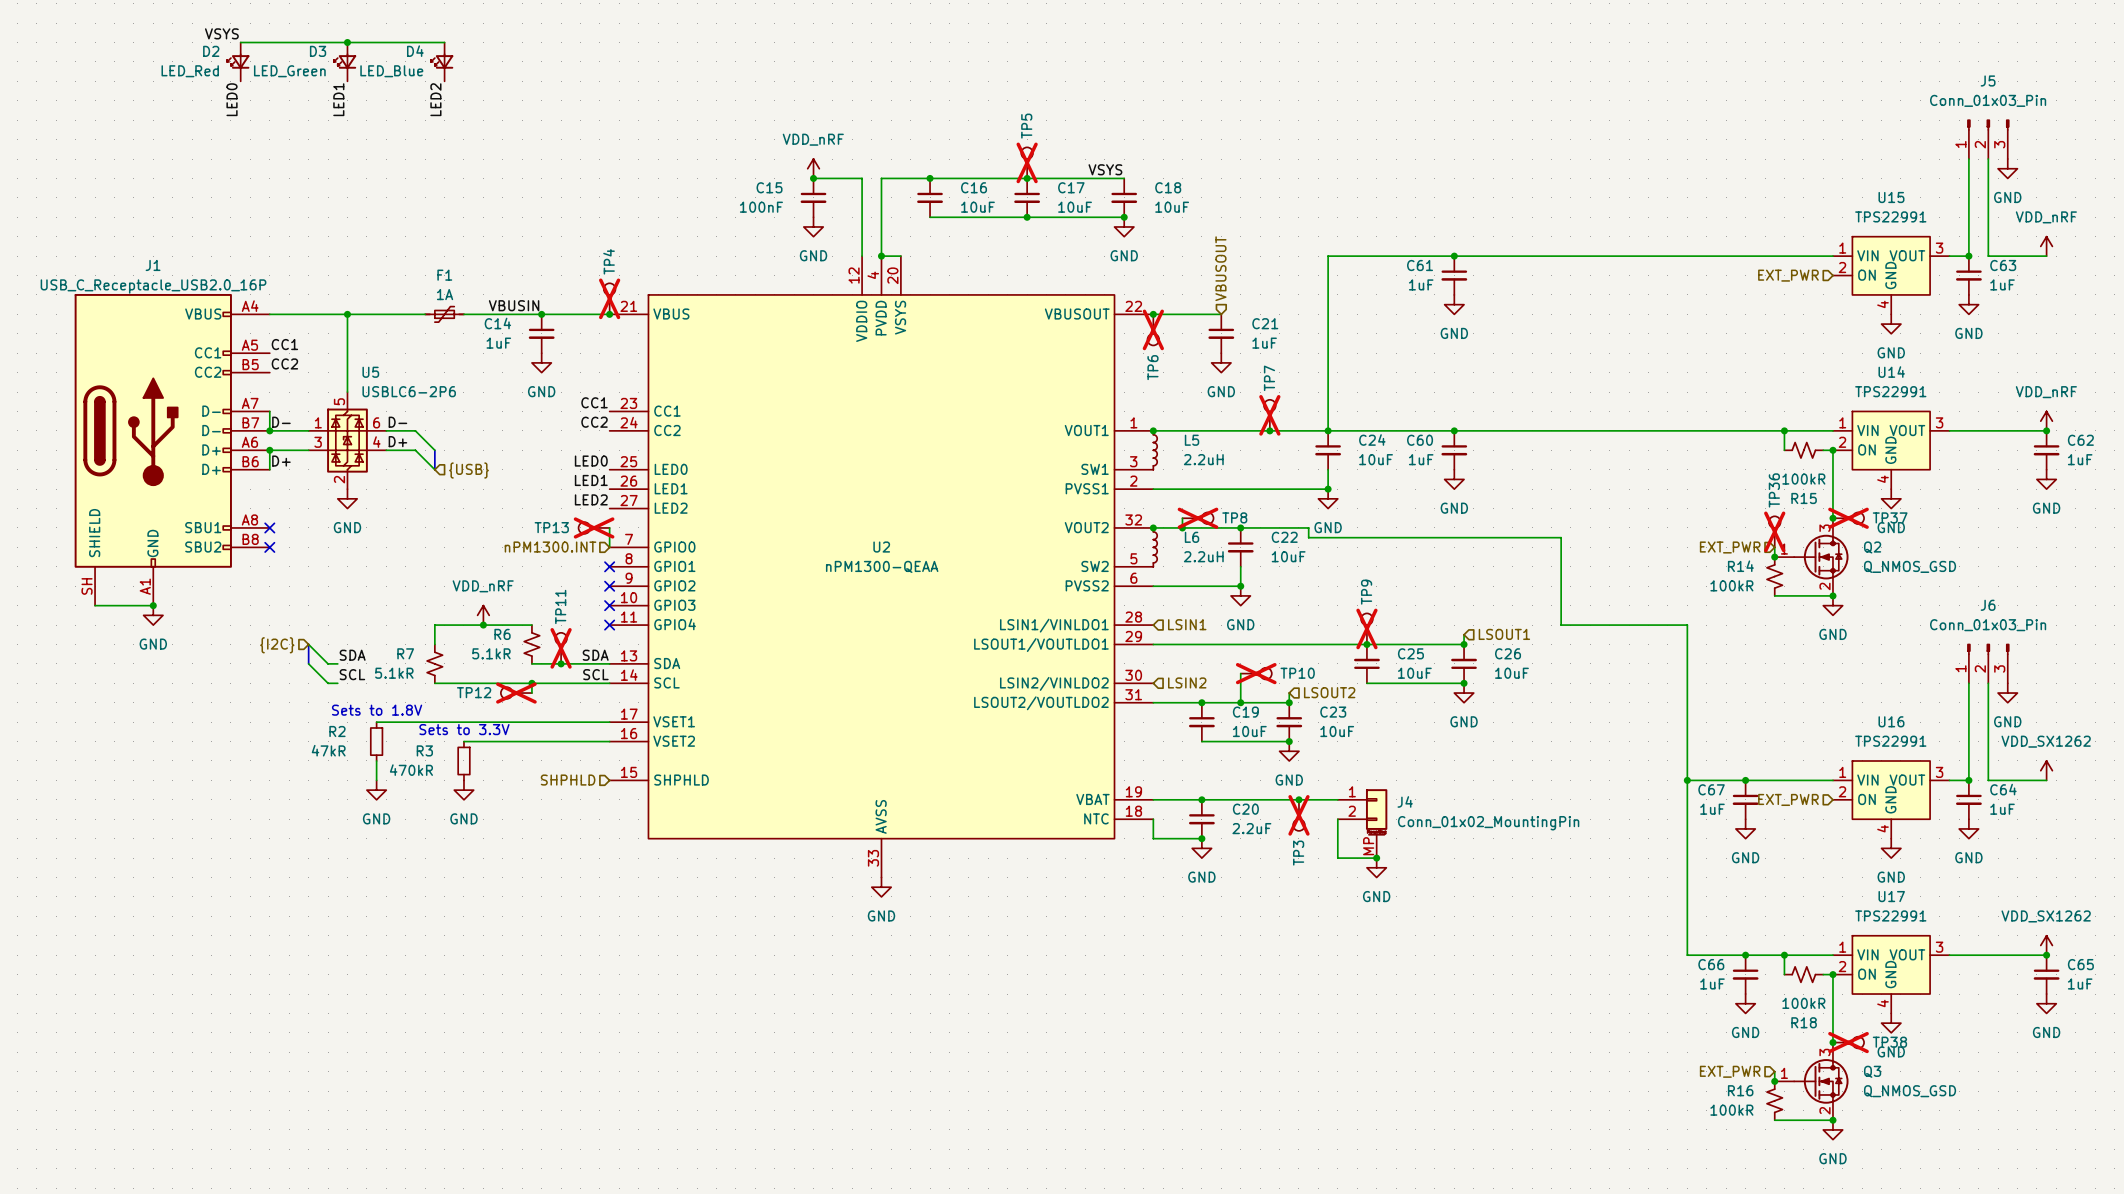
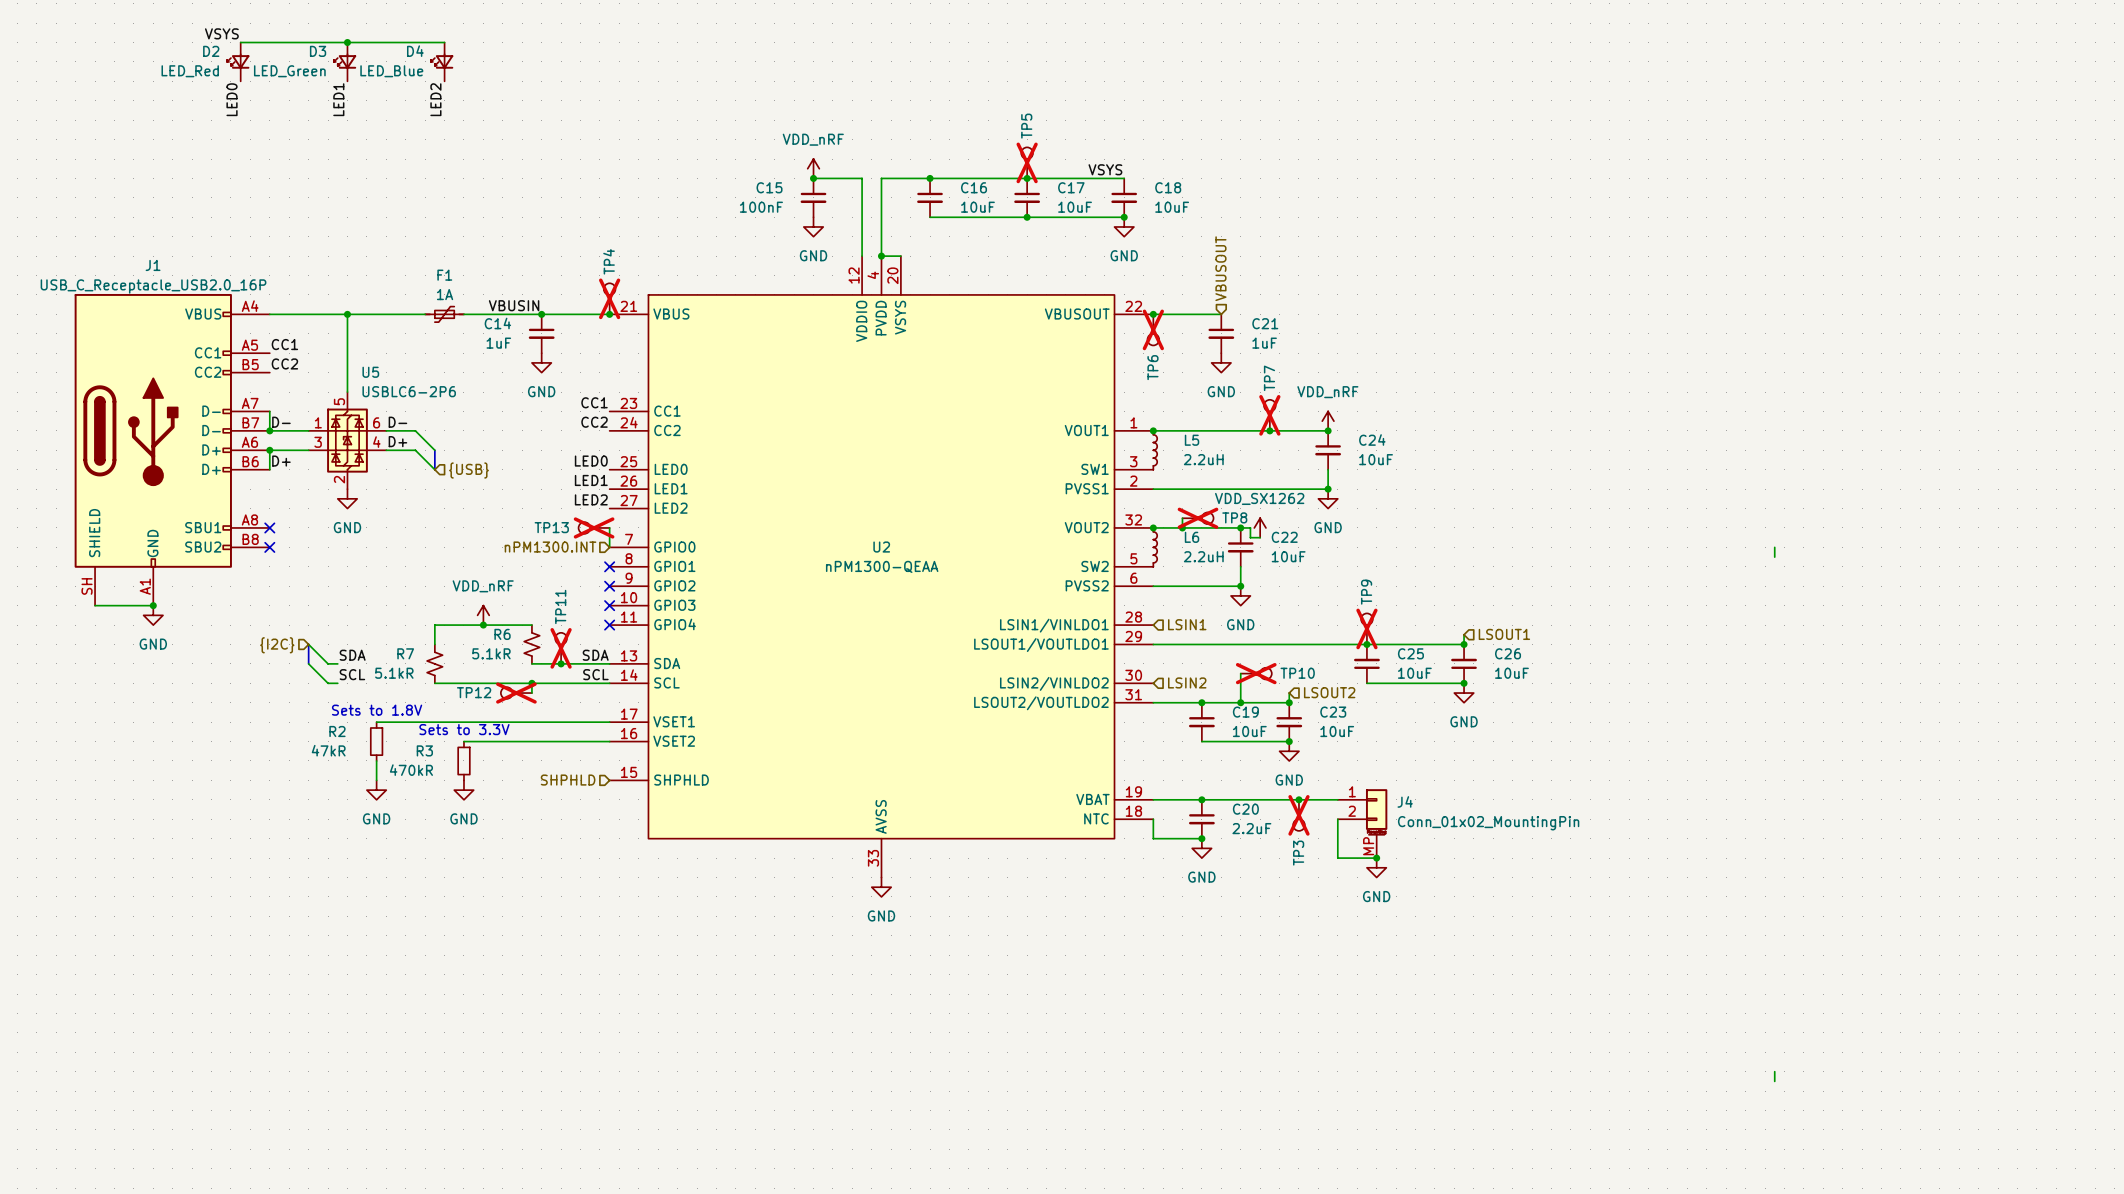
J5: Conn_01x03_Pin (1988, 139) -> none
wire: (1968, 159) (1968, 256) (1949, 256) -> none
wire: (1988, 159) (1988, 256) (2046, 256) -> none
power symbol: GND (2007, 168) -> none
power symbol: VDD_nRF (2046, 246) -> none
junction: (1454, 256) -> none
wire: (1832, 256) (1328, 256) (1328, 430) (1832, 430) -> none
junction: (1968, 256) -> none
C61: 1uF (1454, 275) -> none
hierarchical label: EXT_PWR (1788, 275) -> none
U15: TPS22991 (1891, 275) -> none
C63: 1uF (1968, 275) -> none
power symbol: GND (1454, 304) -> none
power symbol: GND (1968, 304) -> none
power symbol: GND (1891, 324) -> none
power symbol: none -> VDD_nRF (1328, 421)
power symbol: VDD_nRF (2046, 421) -> none
junction: (1454, 430) -> none
wire: (1784, 430) (1784, 450) -> none
junction: (1784, 430) -> none
wire: (1949, 430) (2046, 430) -> none
junction: (2046, 430) -> none
C60: 1uF (1454, 450) -> none
R15: 100kR (1803, 450) -> none
wire: (1823, 450) (1832, 450) (1832, 518) -> none
junction: (1832, 450) -> none
U14: TPS22991 (1891, 450) -> none
C62: 1uF (2046, 450) -> none
power symbol: GND (1454, 479) -> none
power symbol: GND (2046, 479) -> none
power symbol: GND (1891, 498) -> none
junction: (1832, 518) -> none
TP37: (1848, 518) -> none
wire: (1250, 527) (1308, 527) (1308, 537) (1561, 537) (1561, 625) (1687, 625) (1687, 955) (1832, 955) -> (1250, 527) (1250, 537) (1260, 537)
power symbol: none -> VDD_SX1262 (1260, 527)
TP36: (1774, 531) -> none
hierarchical label: EXT_PWR (1730, 547) -> none
junction: (1774, 557) -> none
Q2: Q_NMOS_GSD (1811, 557) -> none
R14: 100kR (1774, 576) -> none
wire: (1774, 595) (1832, 595) -> none
junction: (1832, 595) -> none
power symbol: GND (1832, 605) -> none
J6: Conn_01x03_Pin (1988, 663) -> none
wire: (1968, 683) (1968, 780) (1949, 780) -> none
wire: (1988, 683) (1988, 780) (2046, 780) -> none
power symbol: GND (2007, 693) -> none
power symbol: VDD_SX1262 (2046, 770) -> none
wire: (1687, 780) (1832, 780) -> none
junction: (1687, 780) -> none
junction: (1745, 780) -> none
junction: (1968, 780) -> none
C67: 1uF (1745, 799) -> none
hierarchical label: EXT_PWR (1788, 799) -> none
U16: TPS22991 (1891, 799) -> none
C64: 1uF (1968, 799) -> none
power symbol: GND (1745, 828) -> none
power symbol: GND (1968, 828) -> none
power symbol: GND (1891, 848) -> none
power symbol: VDD_SX1262 (2046, 945) -> none
junction: (1745, 955) -> none
wire: (1784, 955) (1784, 974) -> none
junction: (1784, 955) -> none
wire: (1949, 955) (2046, 955) -> none
junction: (2046, 955) -> none
C66: 1uF (1745, 974) -> none
R18: 100kR (1803, 974) -> none
wire: (1823, 974) (1832, 974) (1832, 1042) -> none
junction: (1832, 974) -> none
U17: TPS22991 (1891, 974) -> none
C65: 1uF (2046, 974) -> none
power symbol: GND (1745, 1003) -> none
power symbol: GND (2046, 1003) -> none
power symbol: GND (1891, 1023) -> none
junction: (1832, 1042) -> none
TP38: (1848, 1042) -> none
hierarchical label: EXT_PWR (1730, 1071) -> none
junction: (1774, 1081) -> none
Q3: Q_NMOS_GSD (1811, 1081) -> none
R16: 100kR (1774, 1100) -> none
wire: (1774, 1120) (1832, 1120) -> none
junction: (1832, 1120) -> none
power symbol: GND (1832, 1129) -> none

